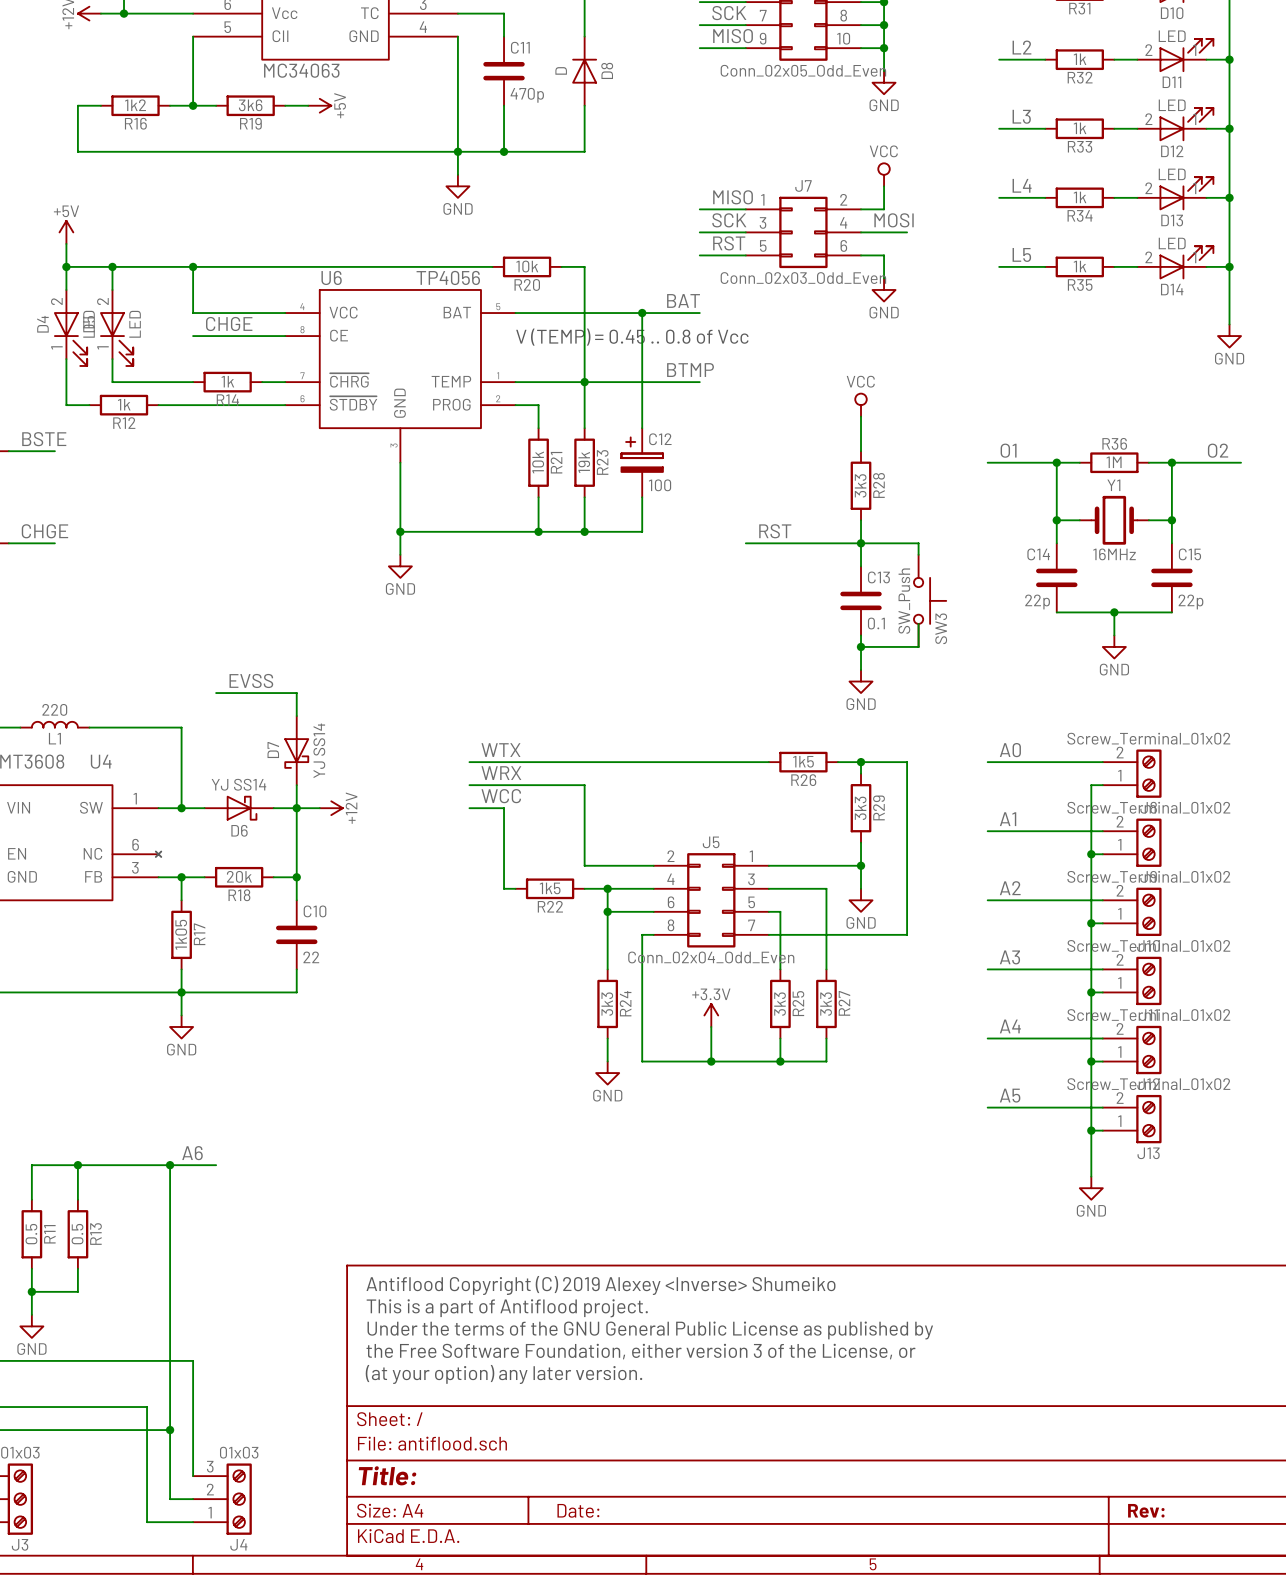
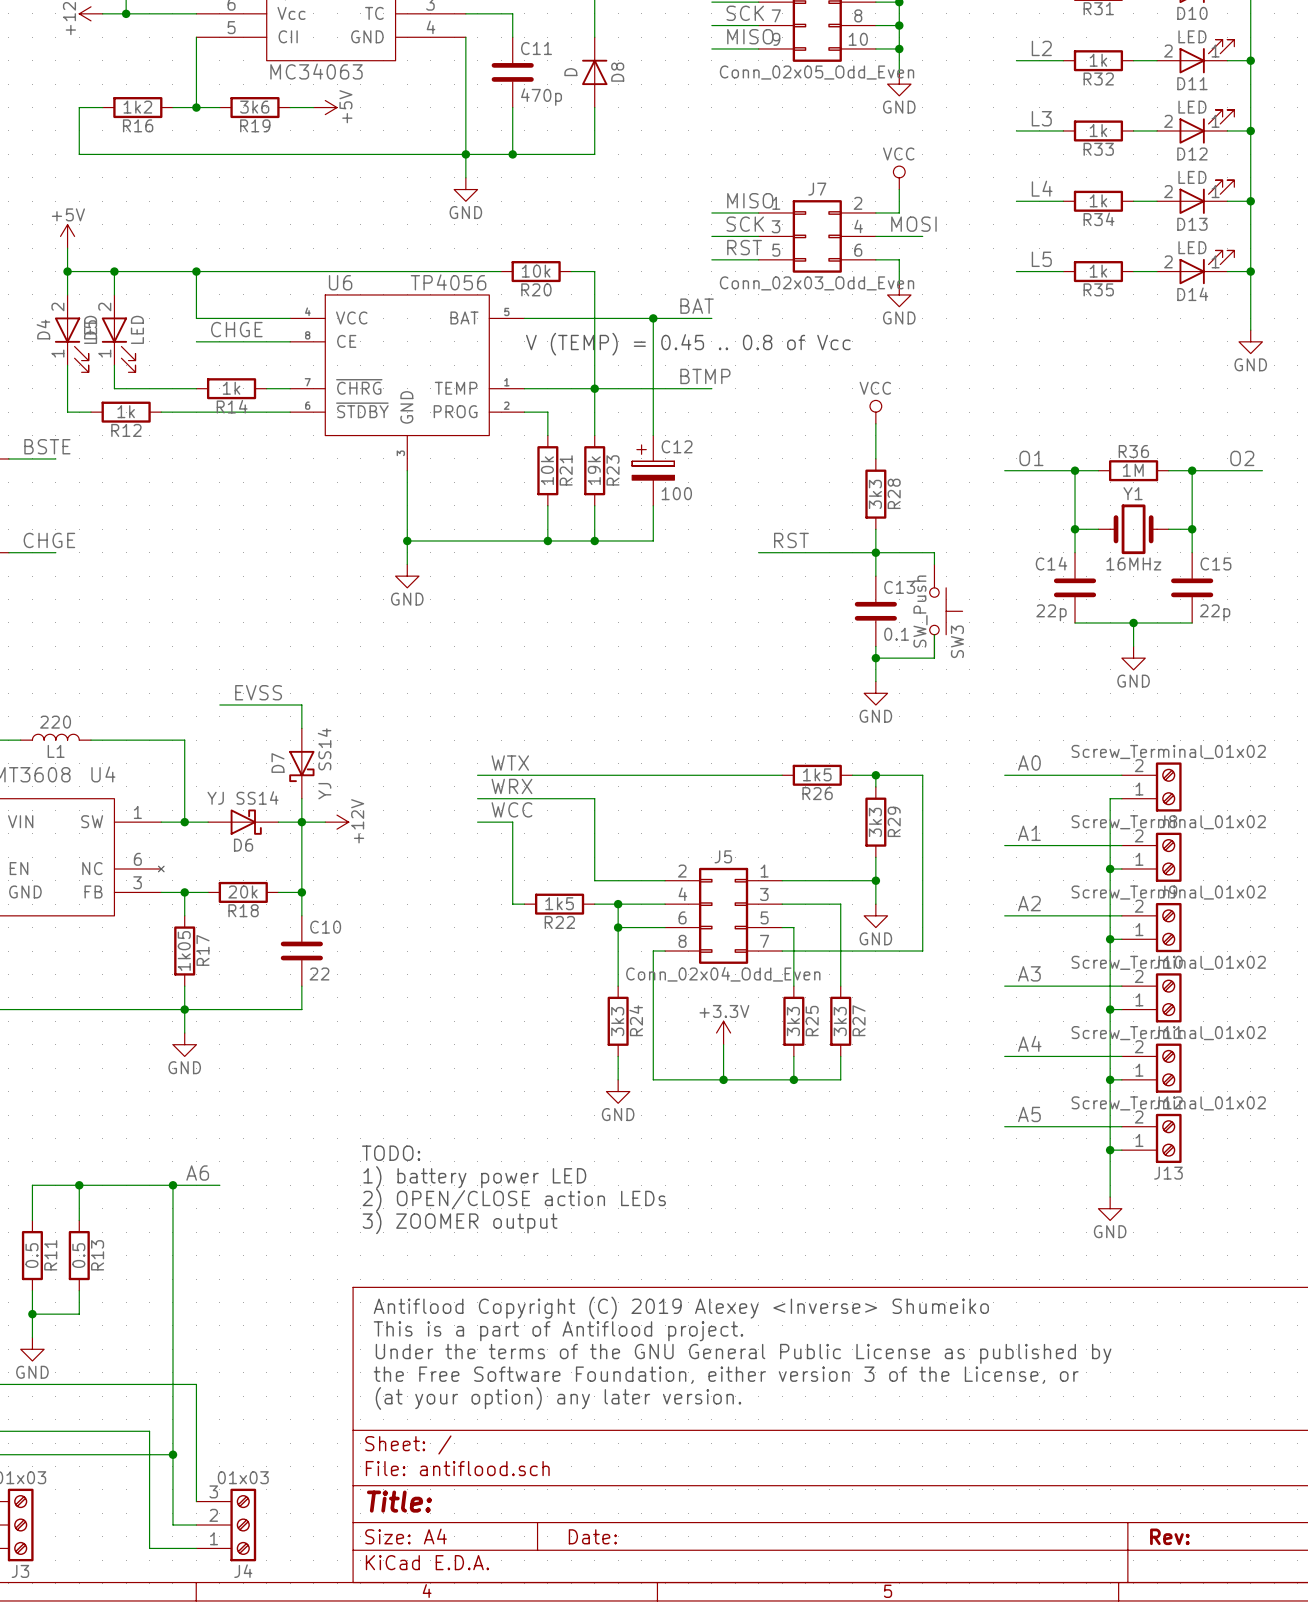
text: none -> TODO: (391, 1153)
text: none -> 1) battery power LED (474, 1177)
text: none -> 2) OPEN/CLOSE action LEDs (514, 1200)
text: none -> 3) ZOOMER output (460, 1222)

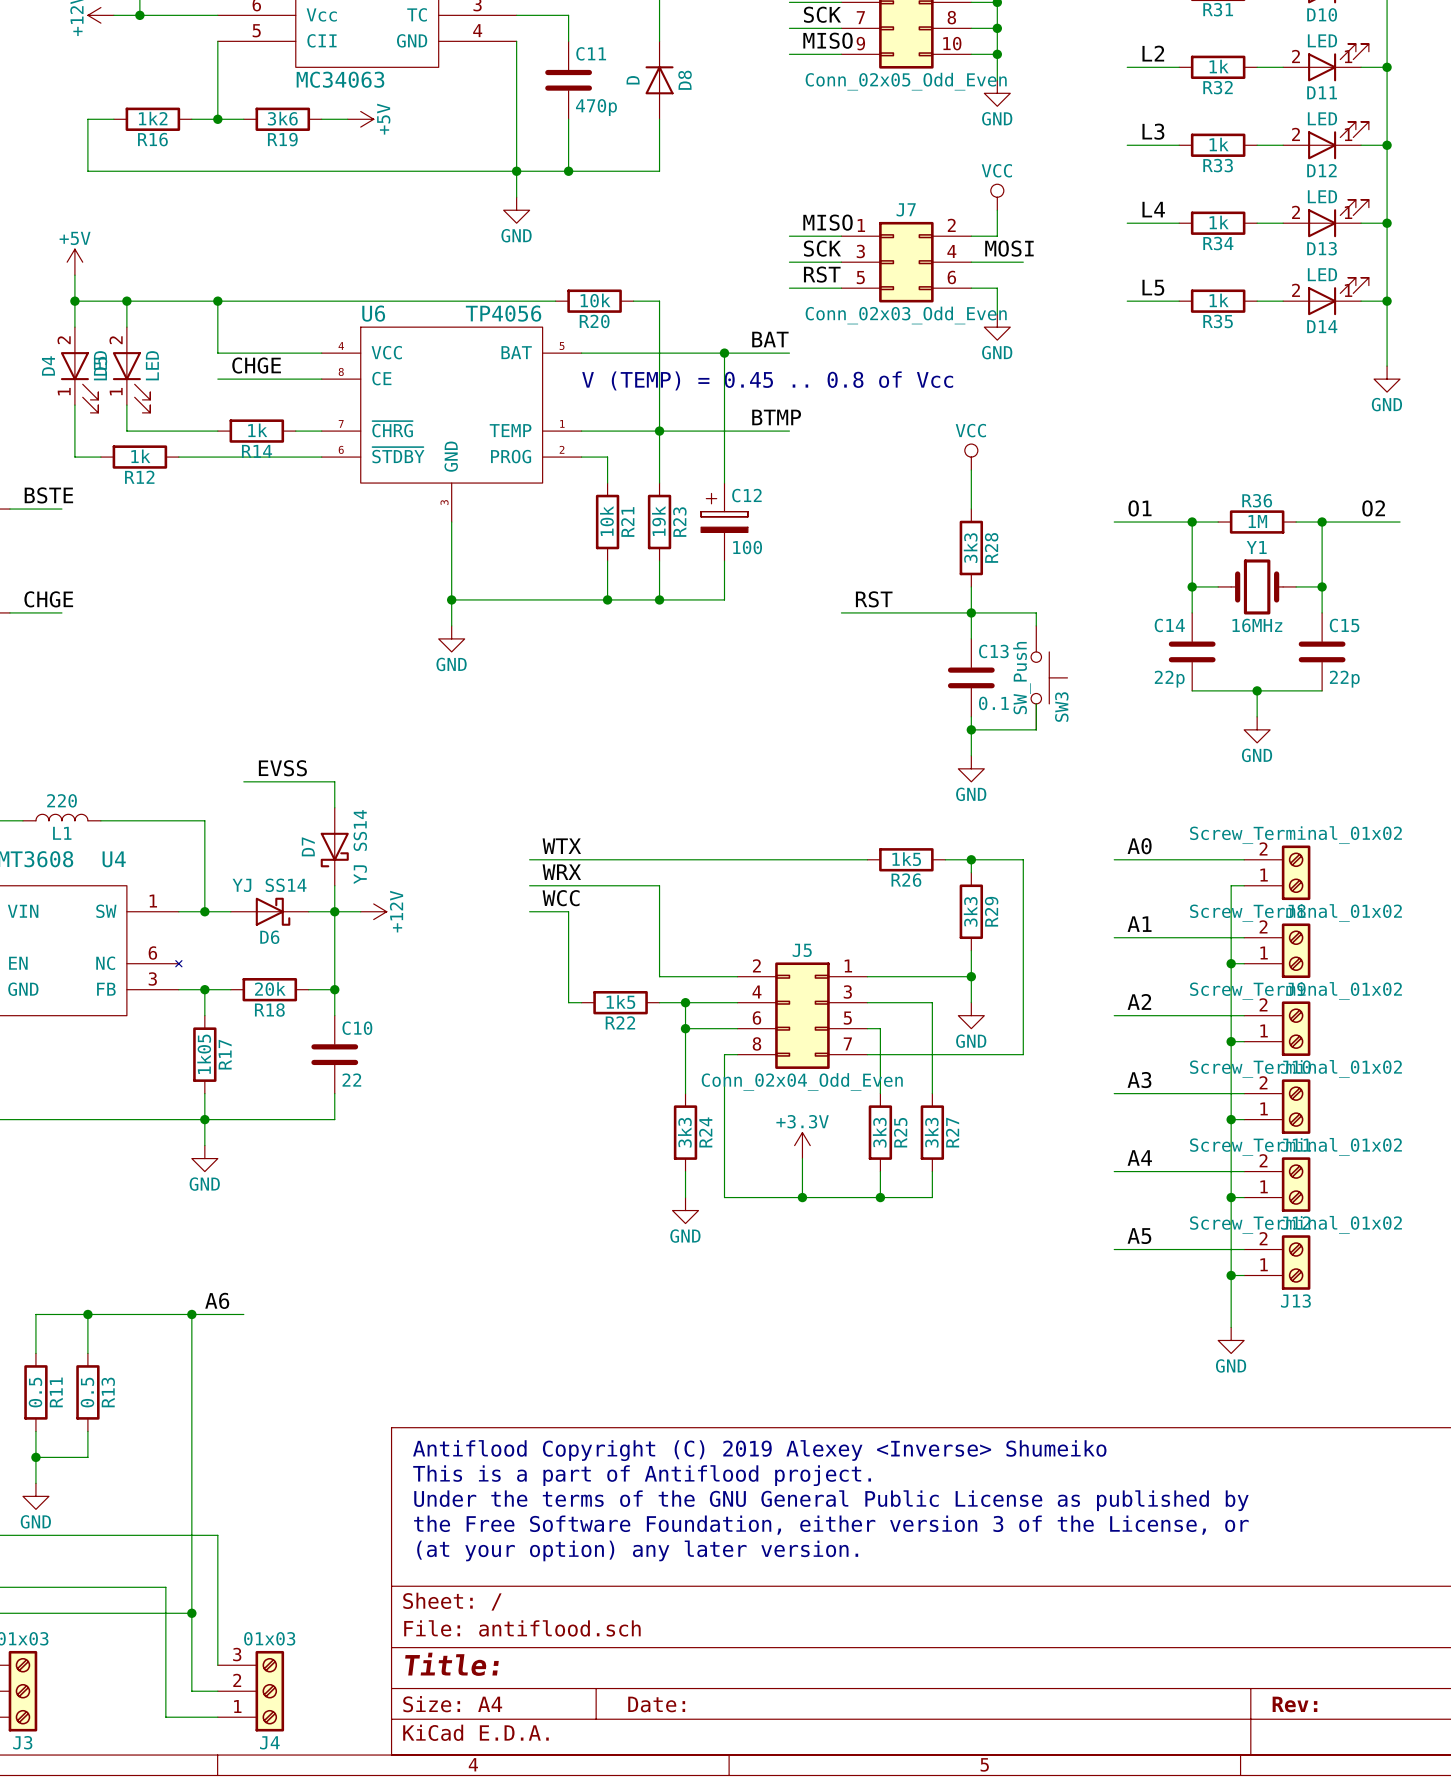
text: TODO: (391, 1153) -> none
text: 1) battery power LED (474, 1177) -> none
text: 2) OPEN/CLOSE action LEDs (514, 1200) -> none
text: 3) ZOOMER output (460, 1222) -> none

